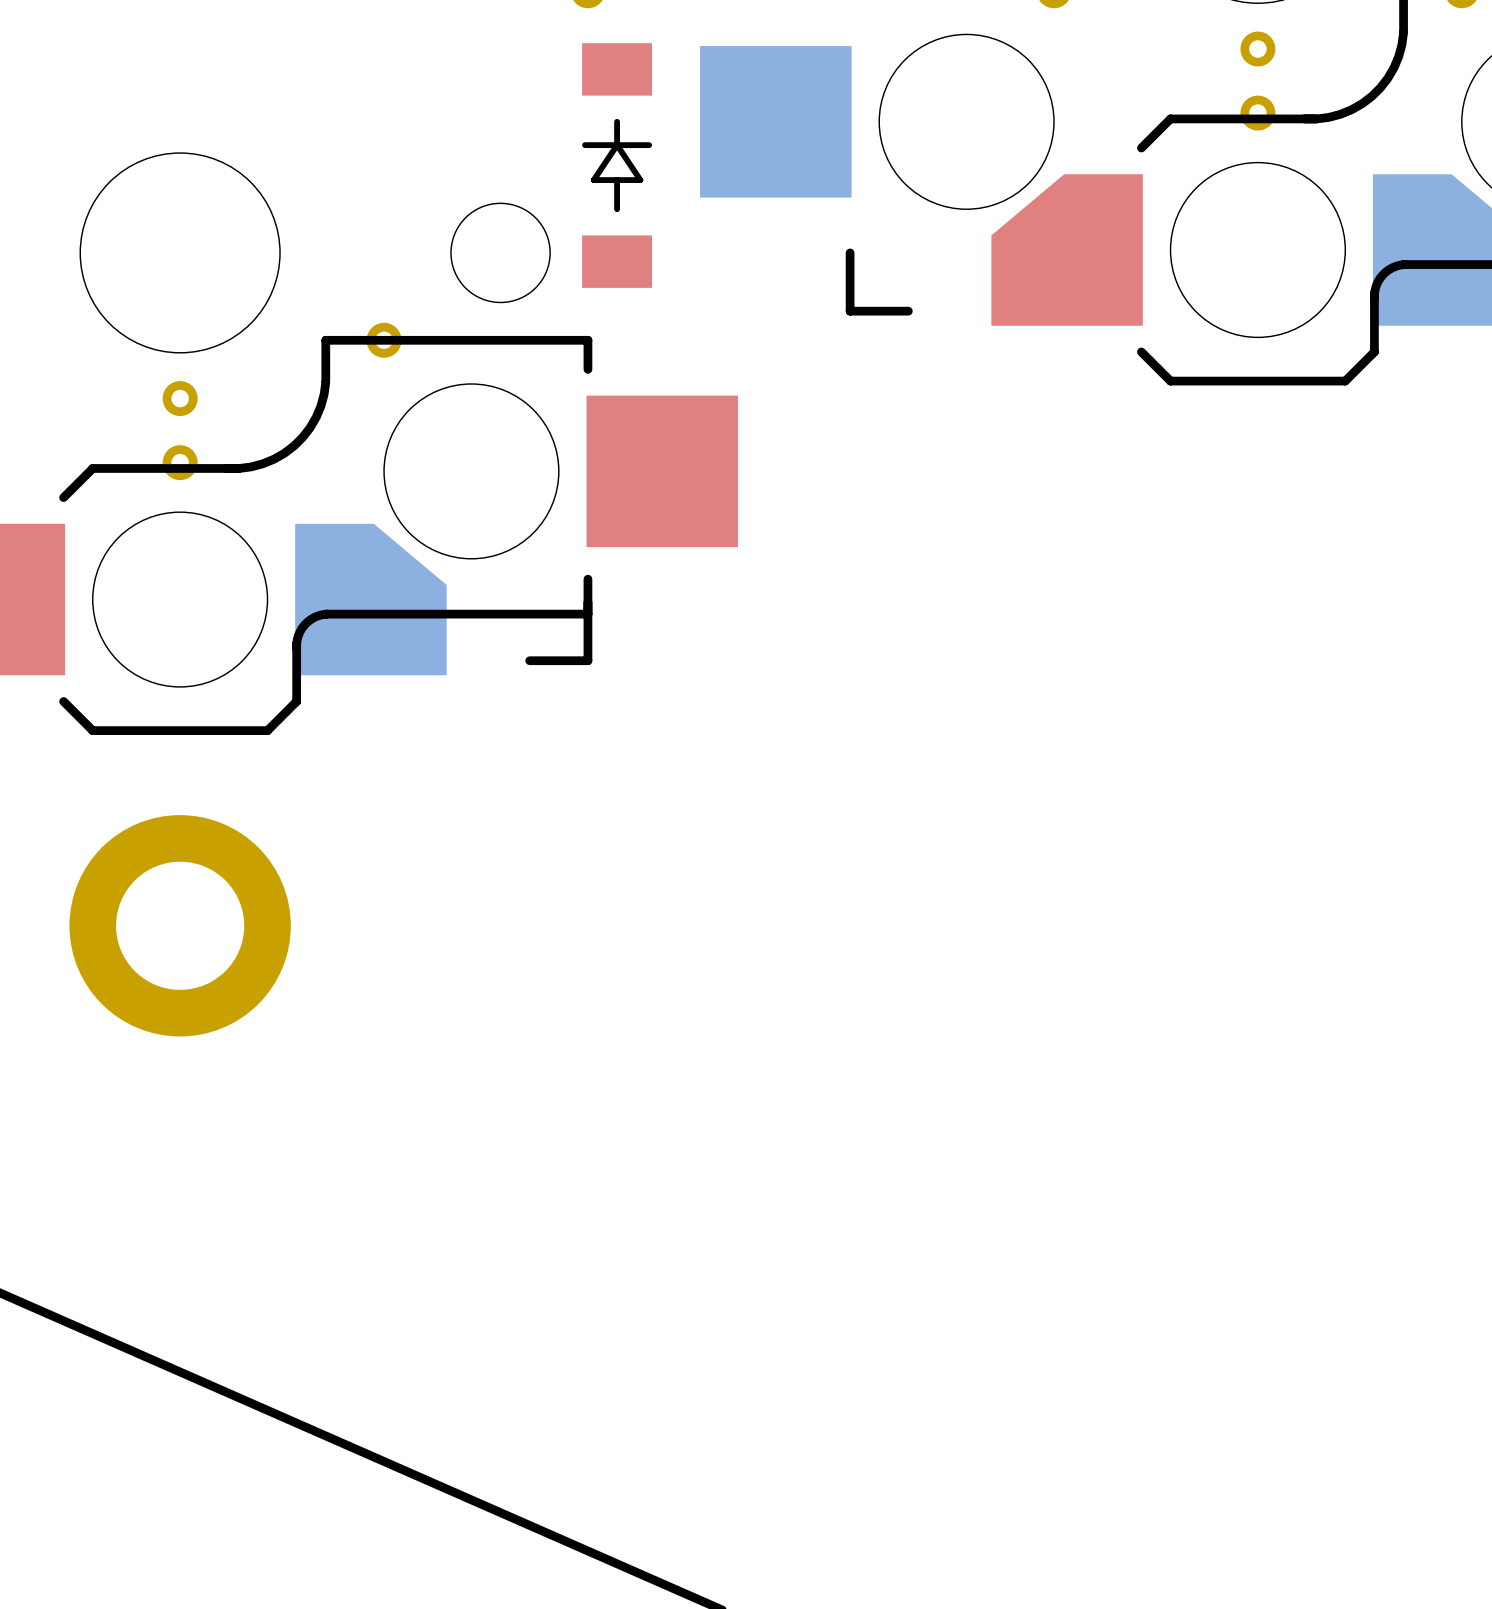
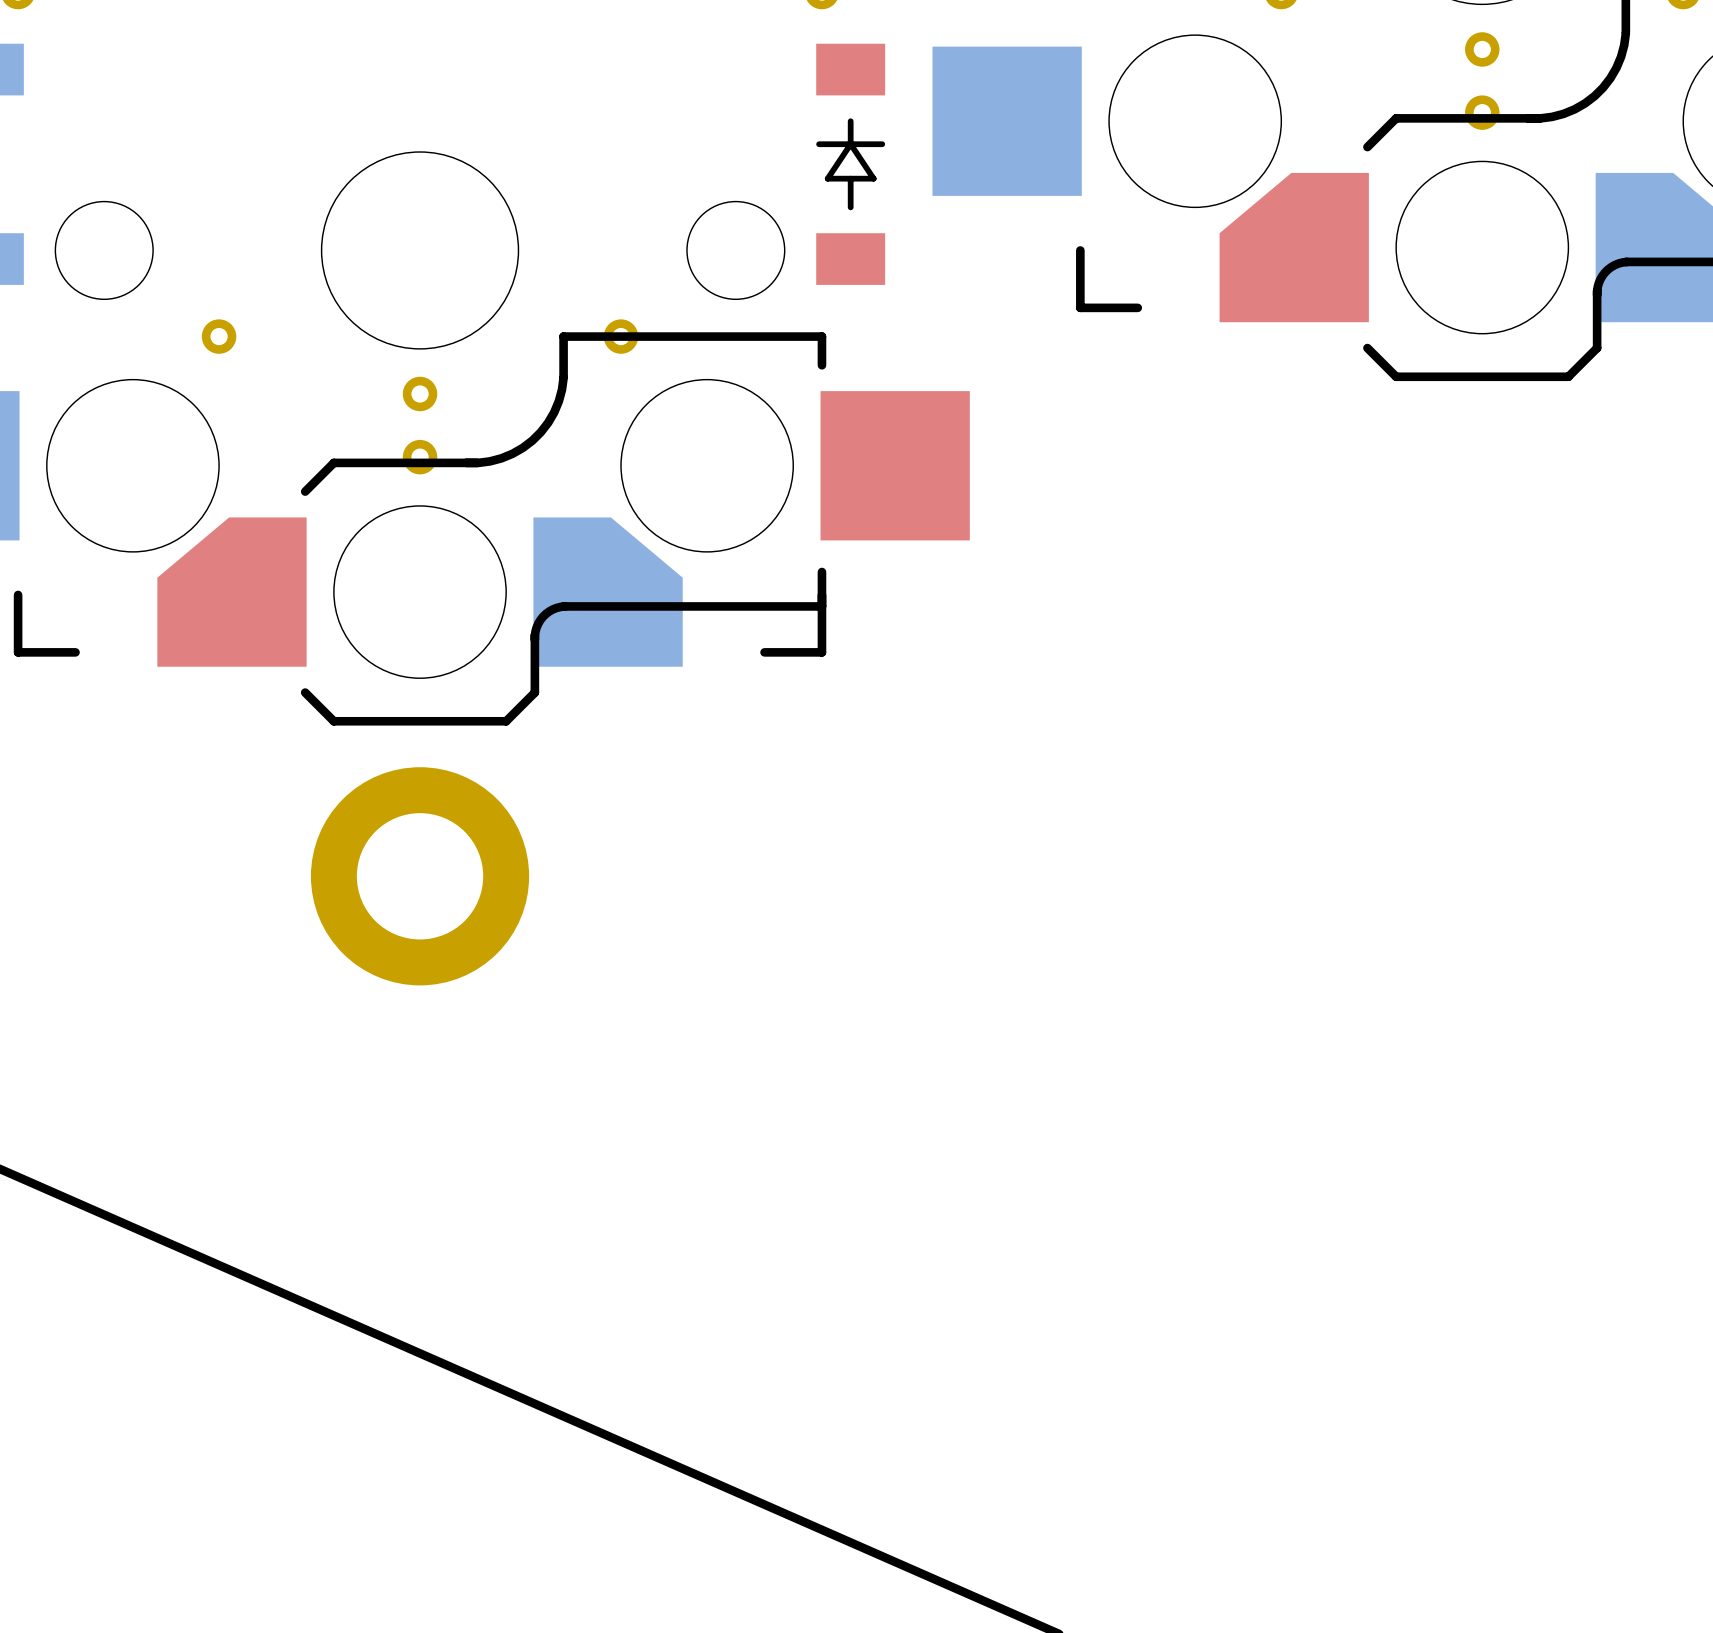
part position: (180, 925) -> (420, 876)

